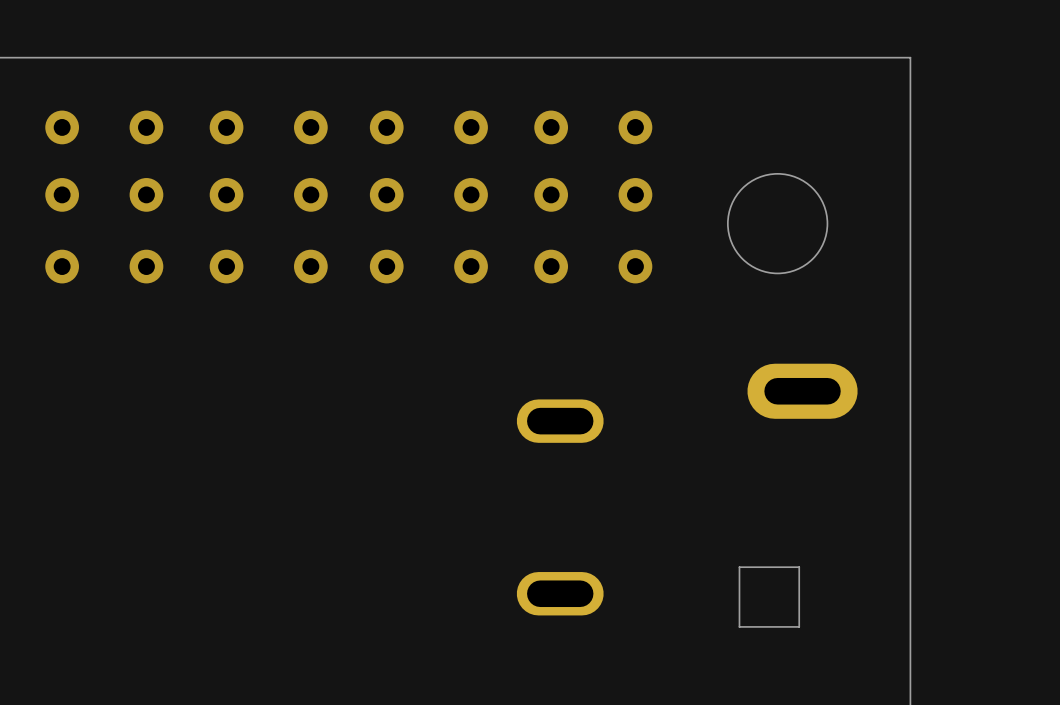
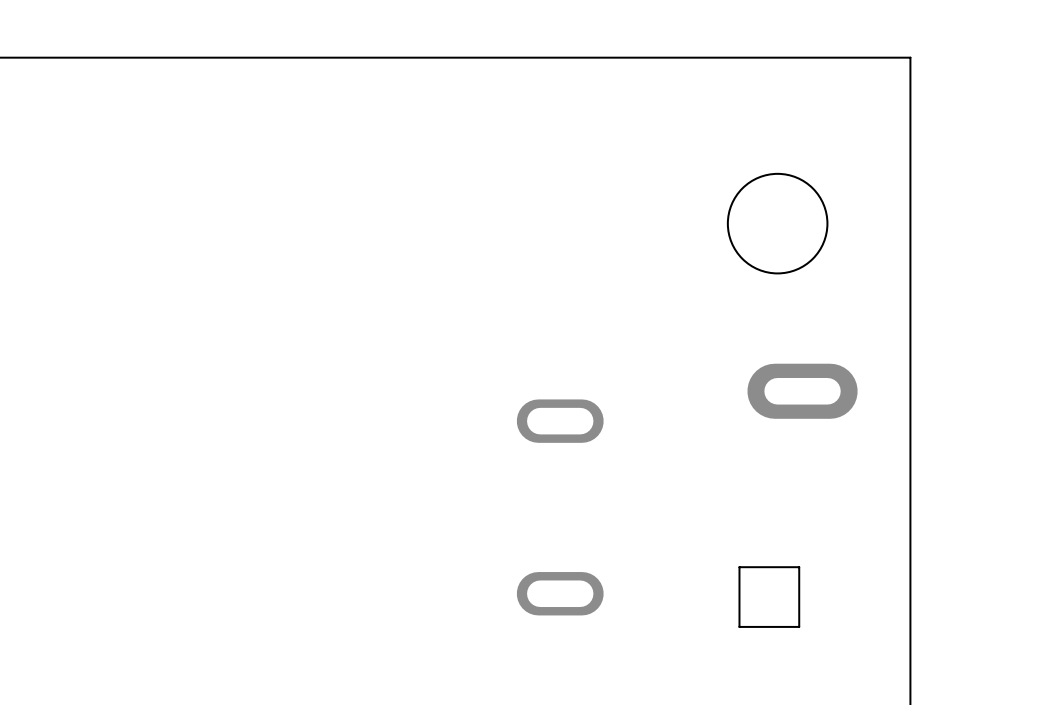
via: (62, 127) -> none
via: (146, 127) -> none
via: (226, 127) -> none
via: (310, 127) -> none
via: (386, 127) -> none
via: (471, 127) -> none
via: (551, 127) -> none
via: (635, 127) -> none
via: (62, 194) -> none
via: (146, 194) -> none
via: (226, 194) -> none
via: (310, 194) -> none
via: (386, 194) -> none
via: (471, 194) -> none
via: (551, 194) -> none
via: (635, 194) -> none
via: (62, 266) -> none
via: (146, 266) -> none
via: (226, 266) -> none
via: (310, 266) -> none
via: (386, 266) -> none
via: (471, 266) -> none
via: (551, 266) -> none
via: (635, 266) -> none

